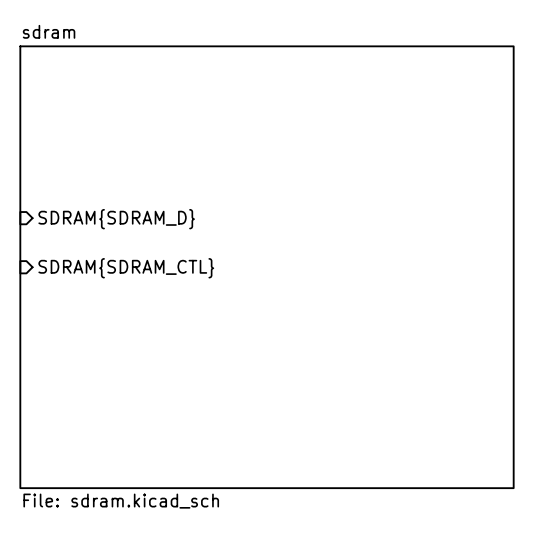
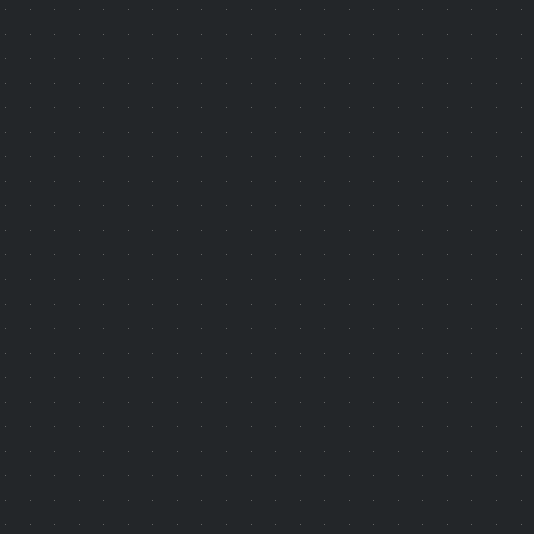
sheet pin: SDRAM{SDRAM_D} (116, 219) -> none
sheet sdram: File: sdram.kicad_sch (267, 267) -> none
sheet pin: SDRAM{SDRAM_CTL} (126, 268) -> none

